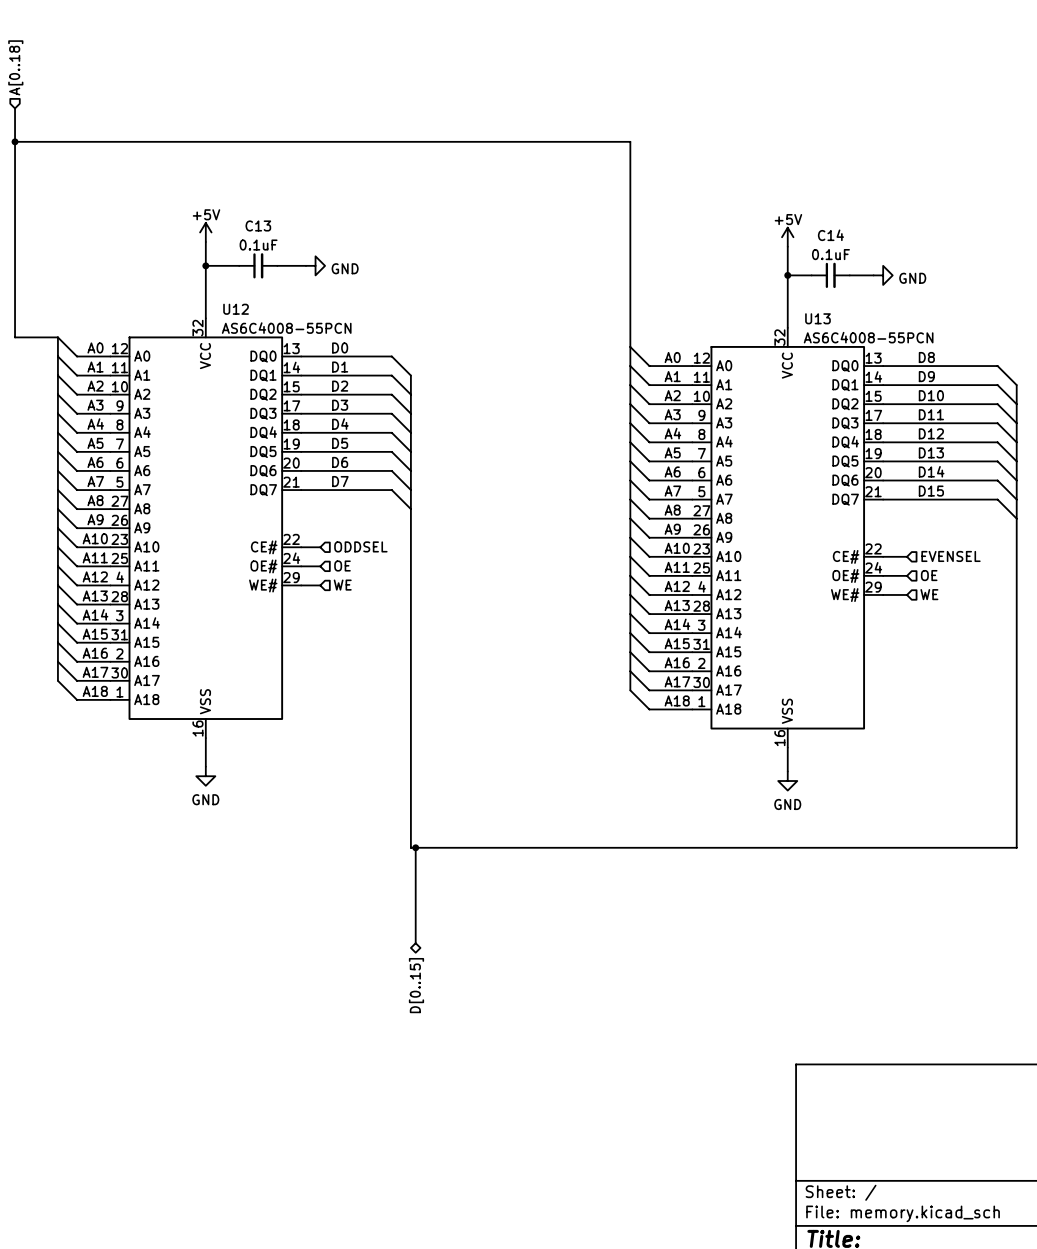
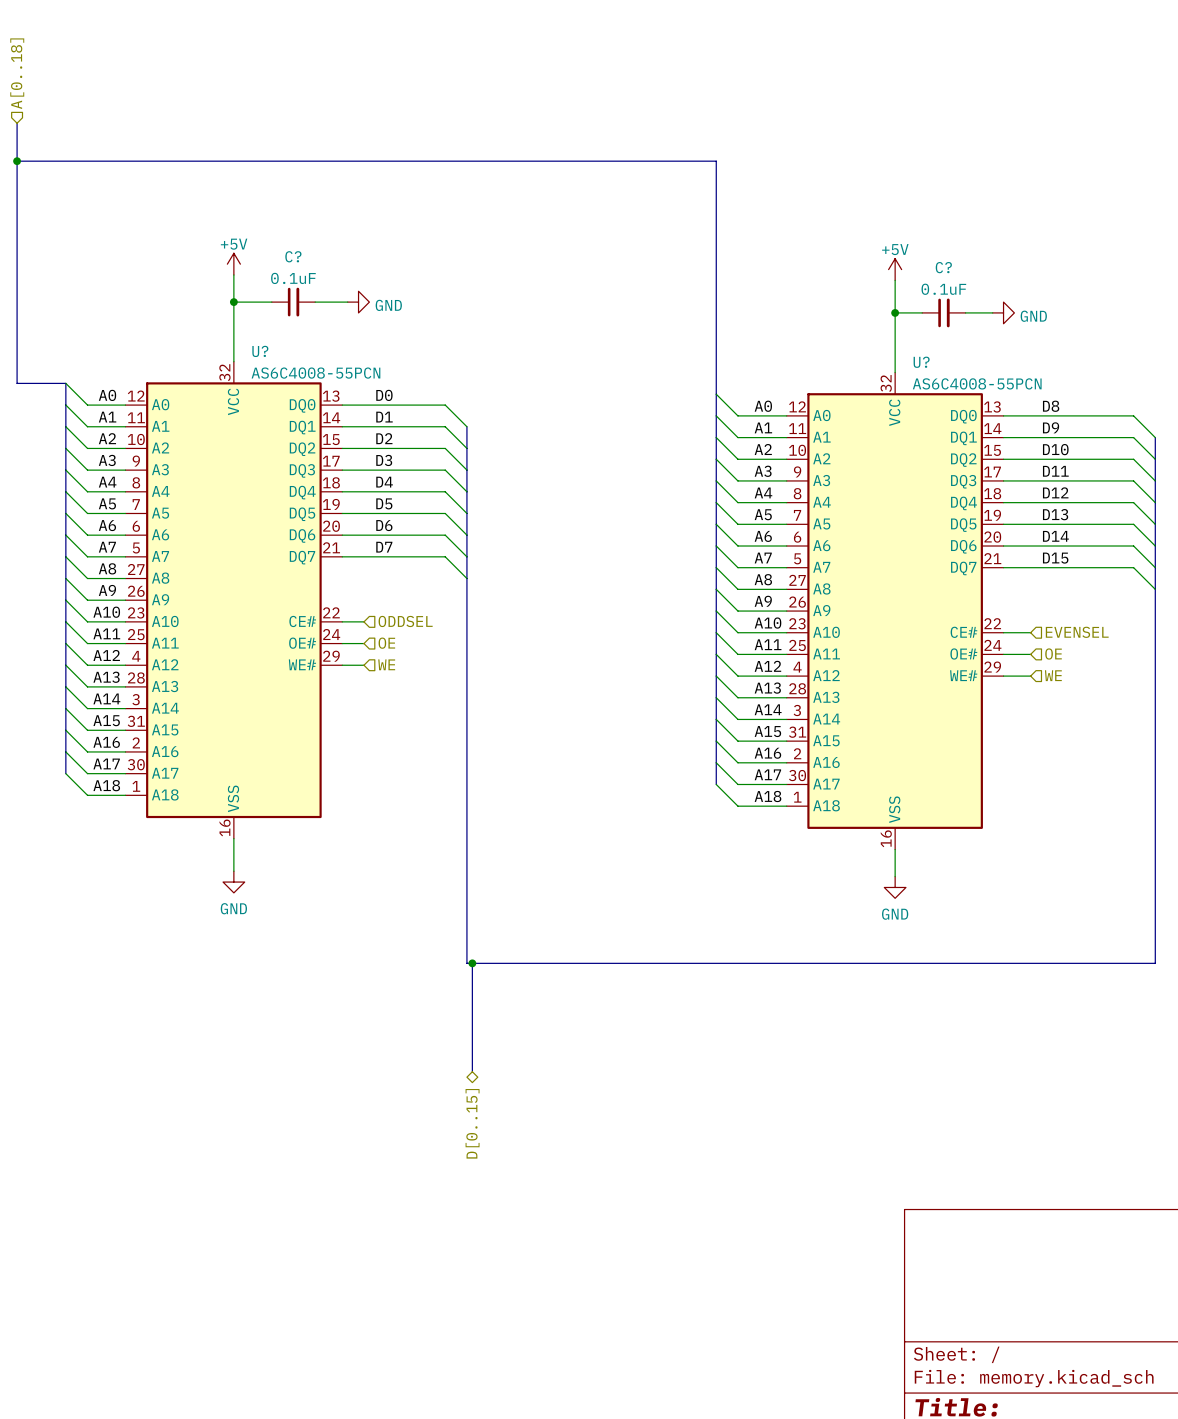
C13 name: C13 (258, 225) -> C? (293, 256)
C14 name: C14 (830, 235) -> C? (943, 267)
U12 name: U12 (236, 309) -> U? (260, 351)
U13 name: U13 (817, 318) -> U? (921, 362)

